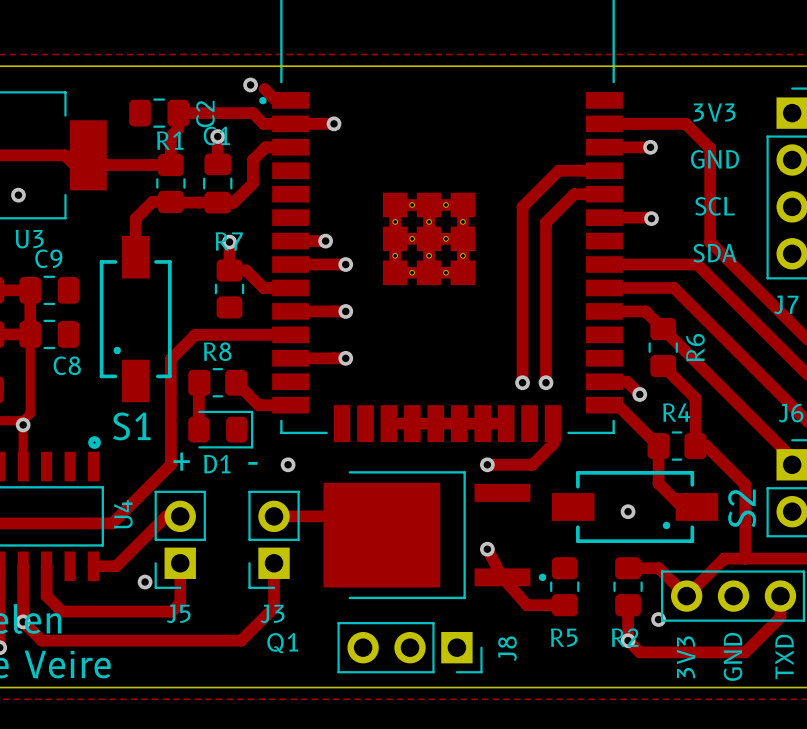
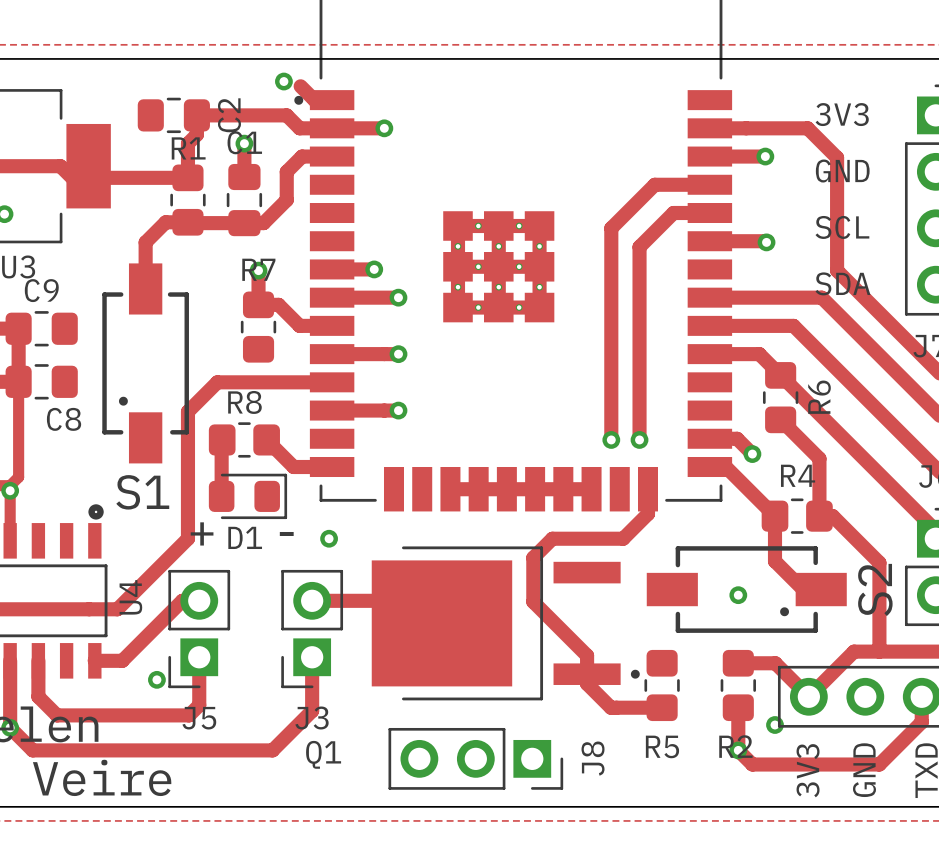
via: (487, 464) -> none
track: (487, 549) (502, 577) (526, 605) -> (568, 538) (552, 538) (533, 557) (533, 601) (587, 655) (587, 683) (610, 707) (616, 707)
via: (487, 549) -> none

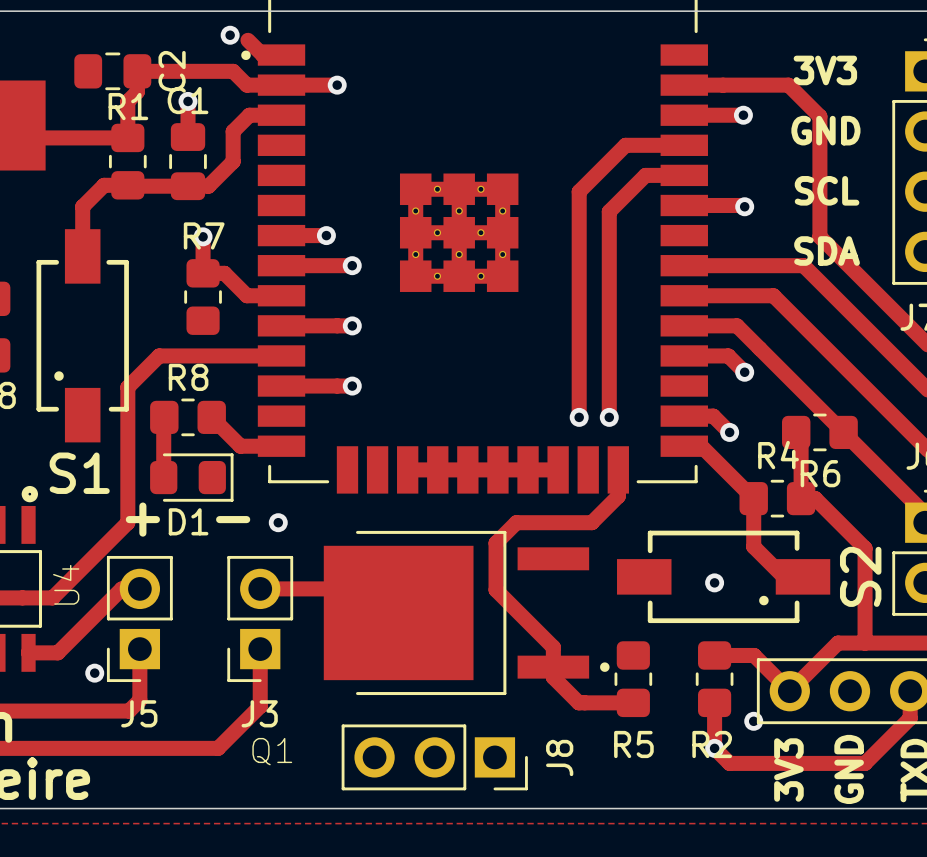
track: none -> (684, 355) (728, 355) (744, 372)
via: none -> (744, 372)
R6 rotation: 0° (780, 397) -> 90° clockwise (819, 432)
R6 position: (780, 397) -> (819, 432)
track: (780, 419) (819, 458) -> none

